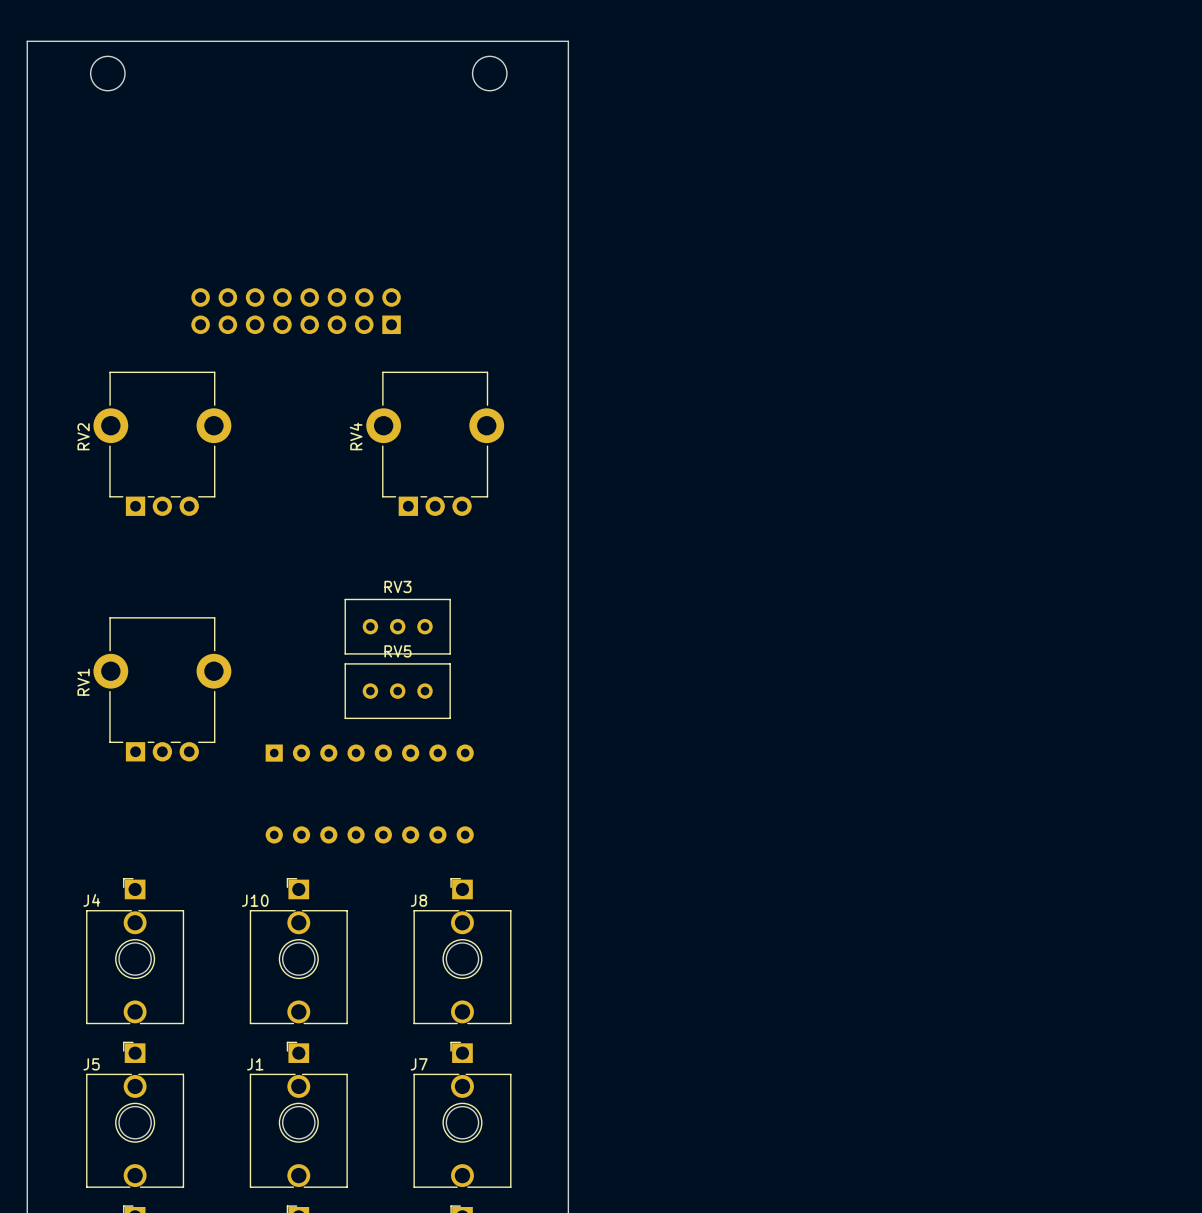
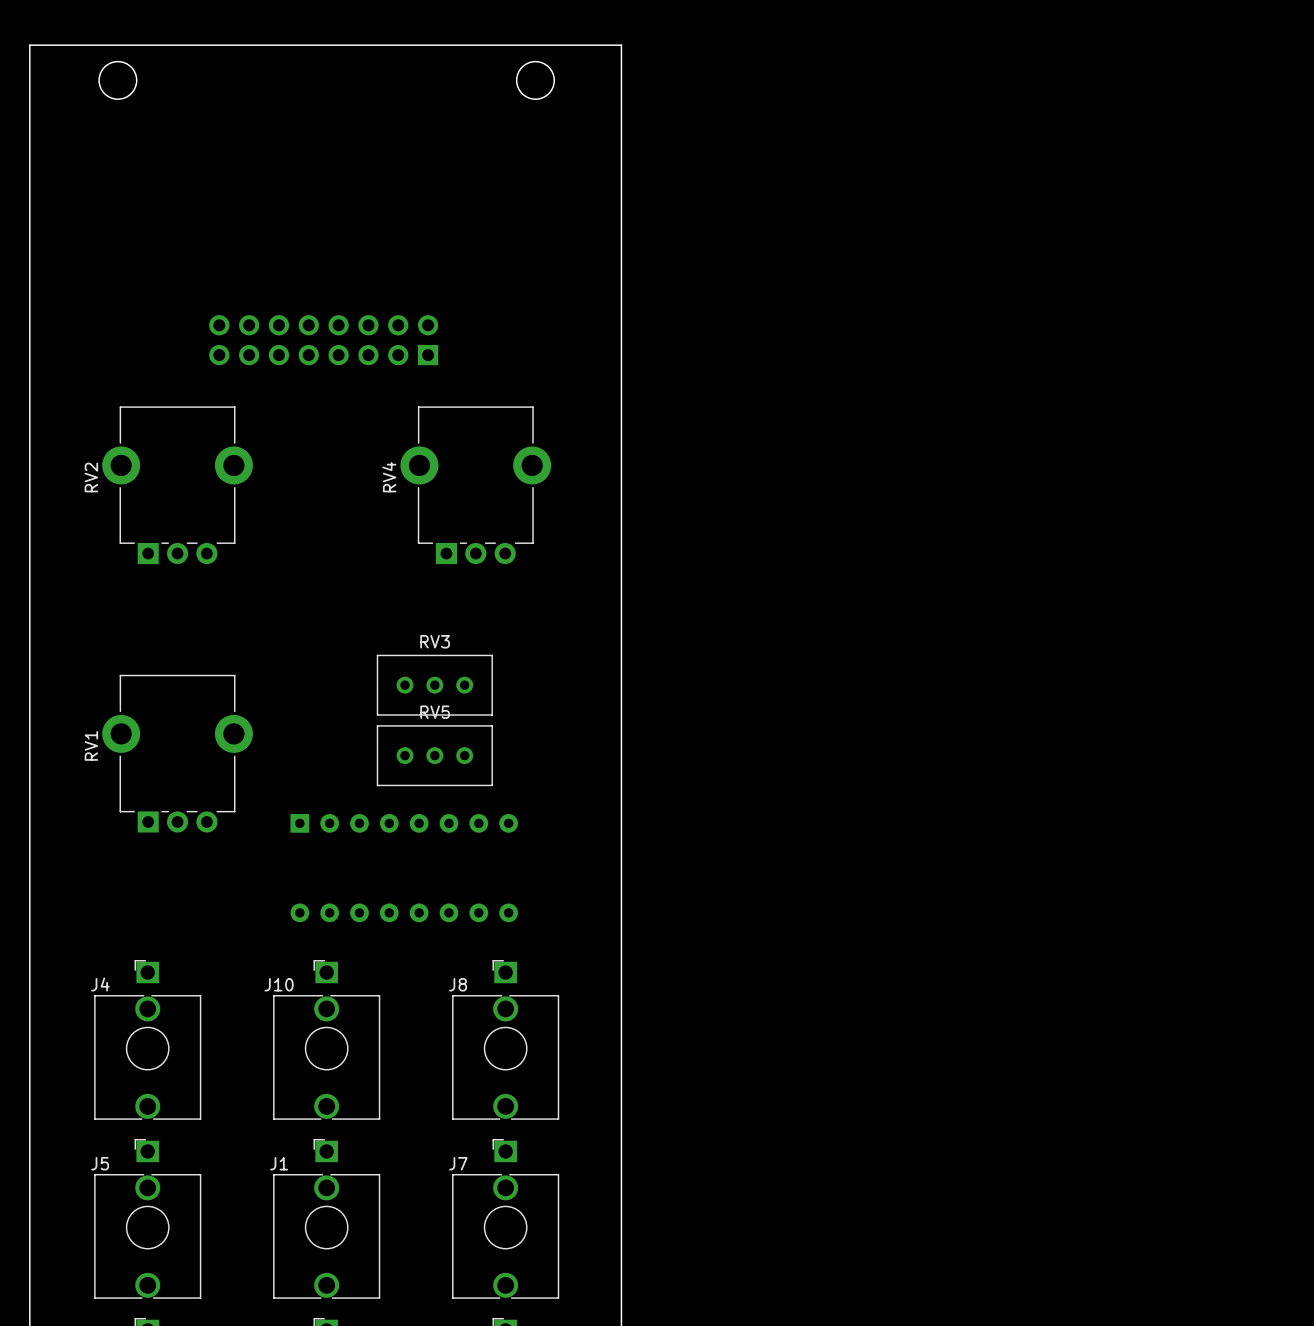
round board edge: [118, 942, 152, 976] -> none
round board edge: [282, 942, 316, 976] -> none
round board edge: [446, 942, 479, 976] -> none
round board edge: [118, 1106, 152, 1140] -> none
round board edge: [282, 1106, 316, 1140] -> none
round board edge: [446, 1106, 479, 1140] -> none

